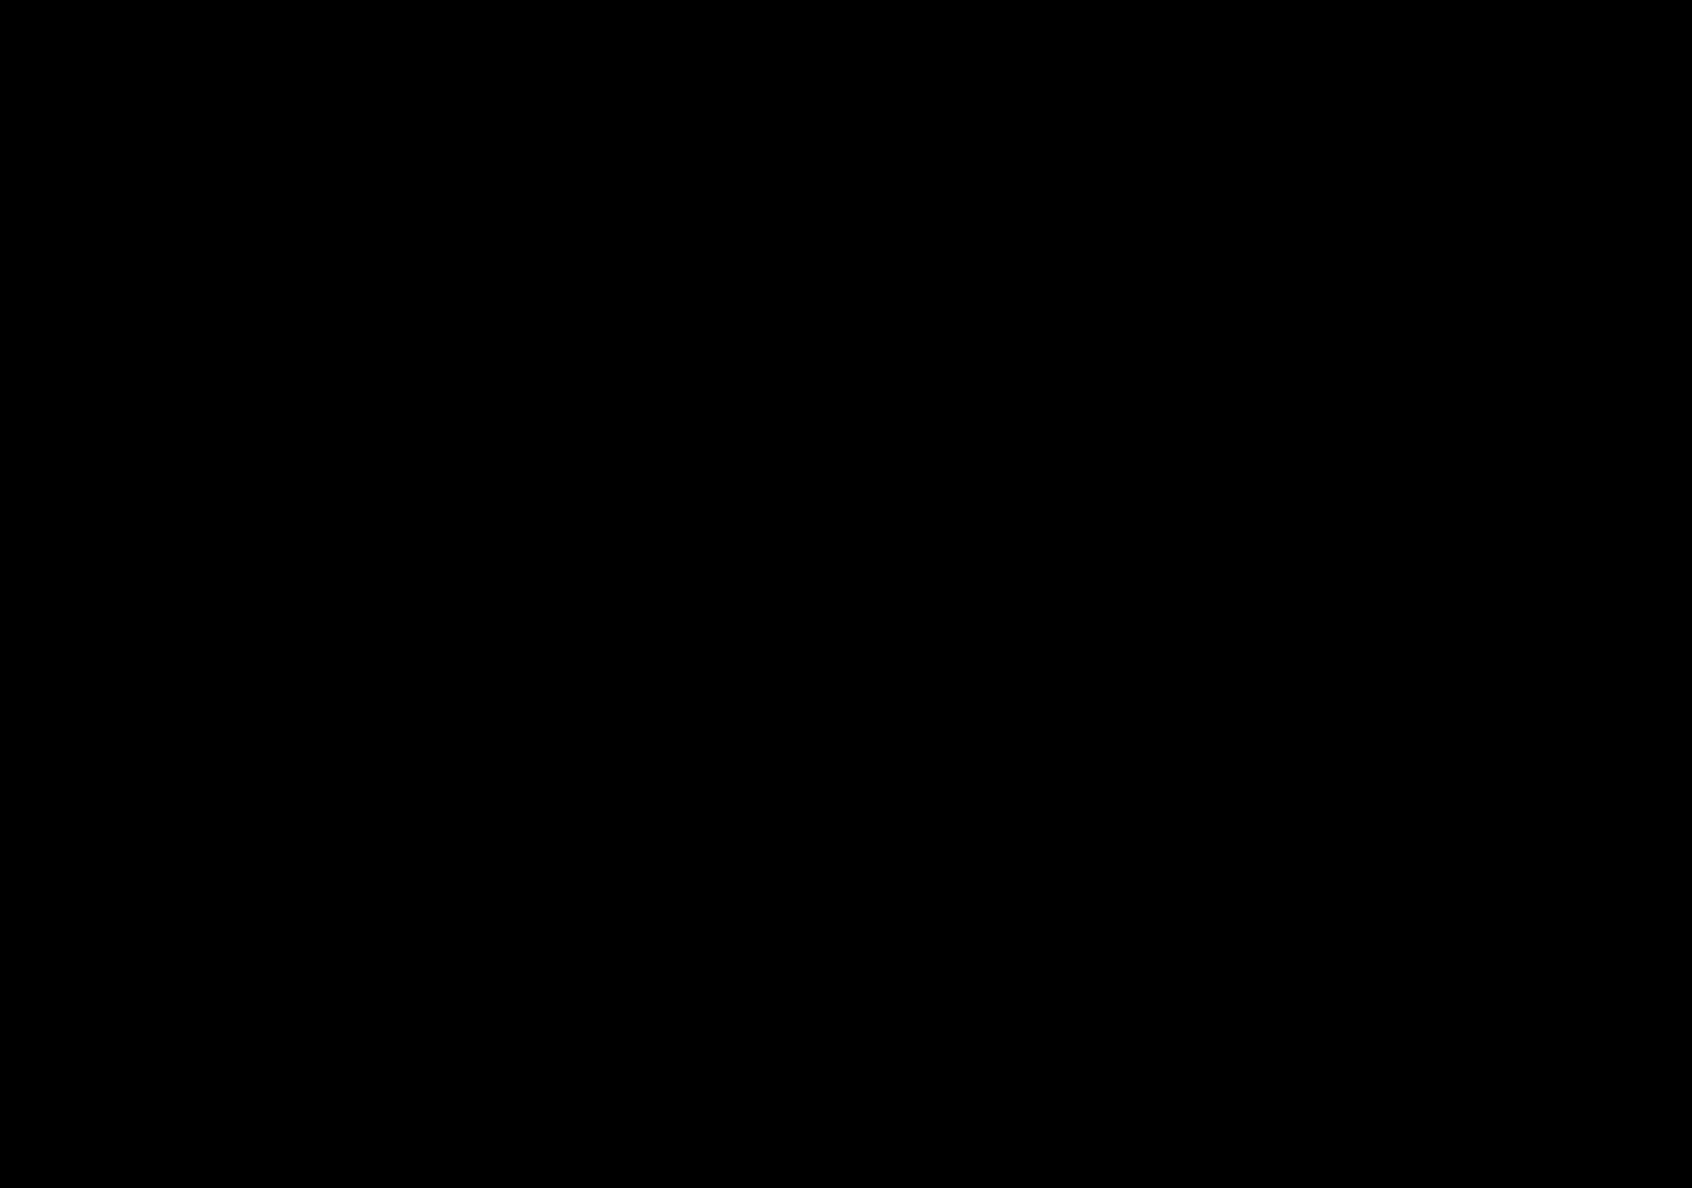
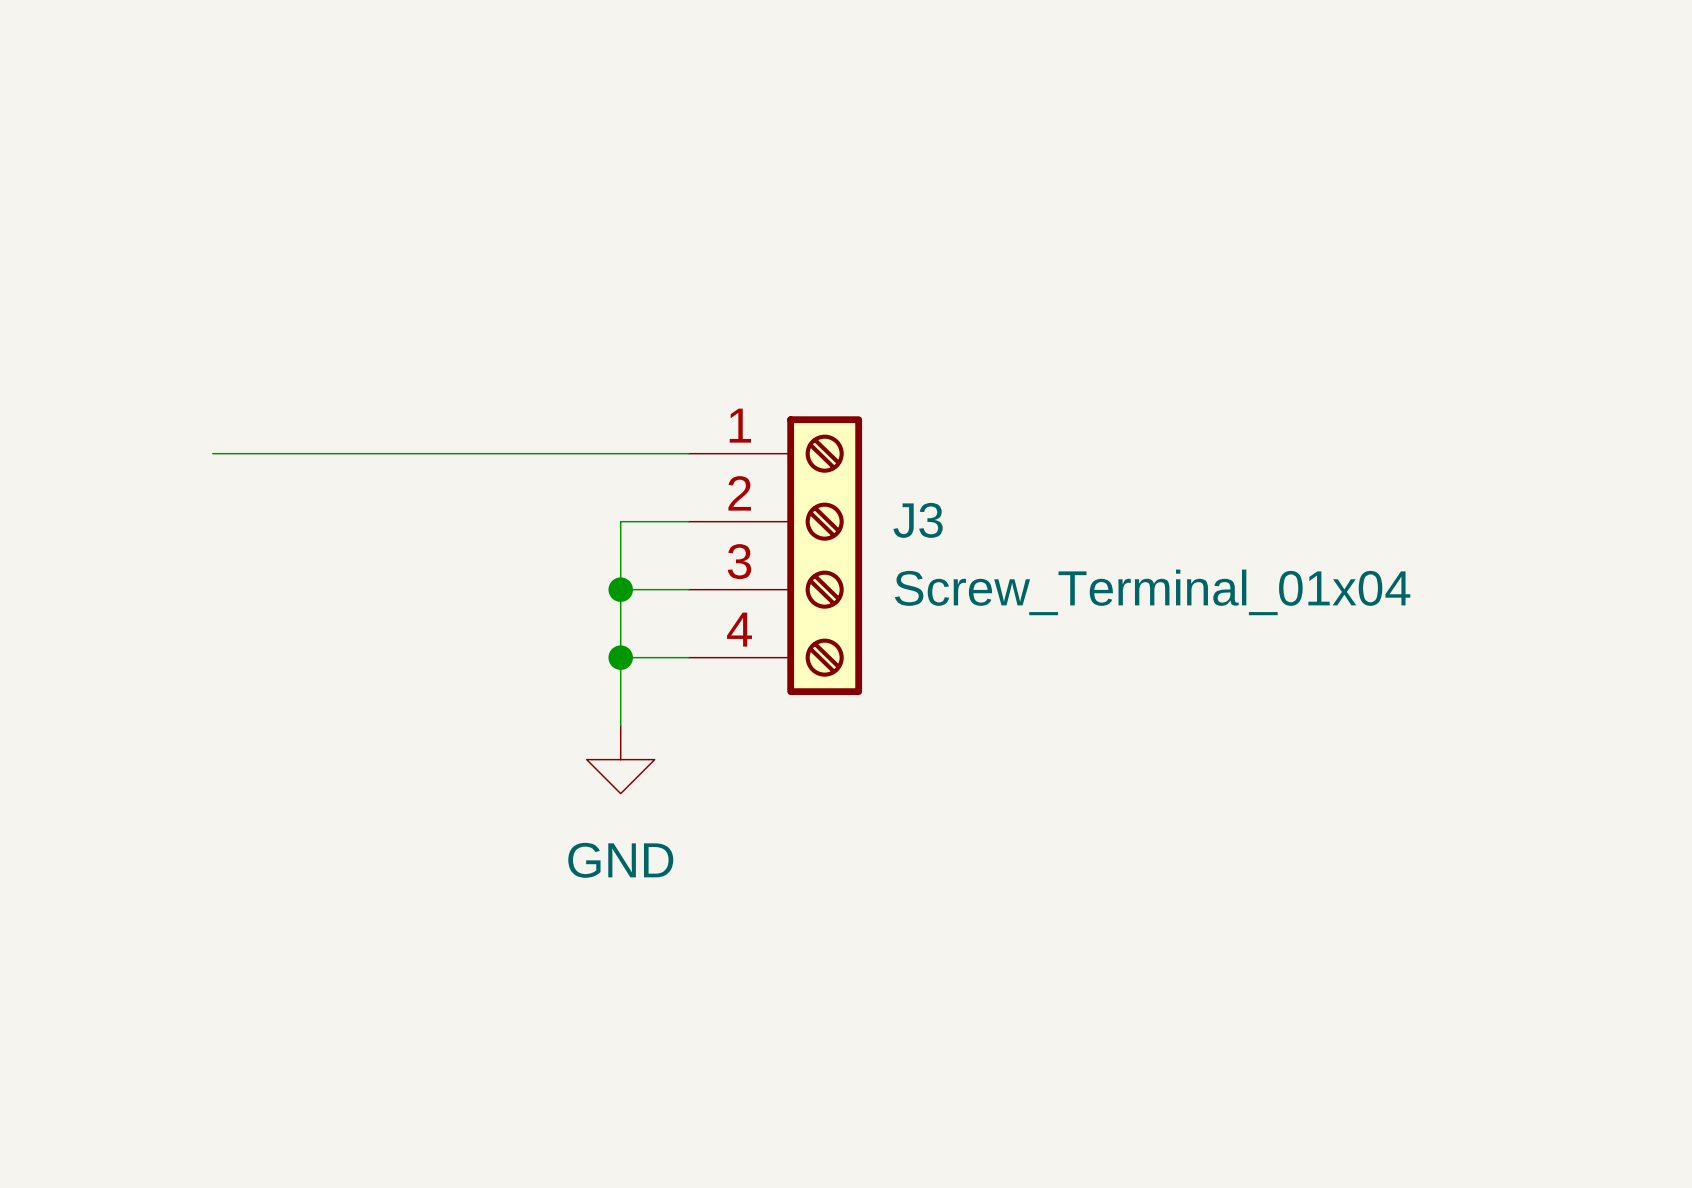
wire: none -> (212, 453) (688, 453)
wire: none -> (688, 521) (620, 521) (620, 725)
J3: none -> Screw_Terminal_01x04 (775, 555)
wire: none -> (620, 589) (688, 589)
junction: none -> (620, 589)
wire: none -> (620, 657) (688, 657)
junction: none -> (620, 657)
power symbol: none -> GND (620, 759)

